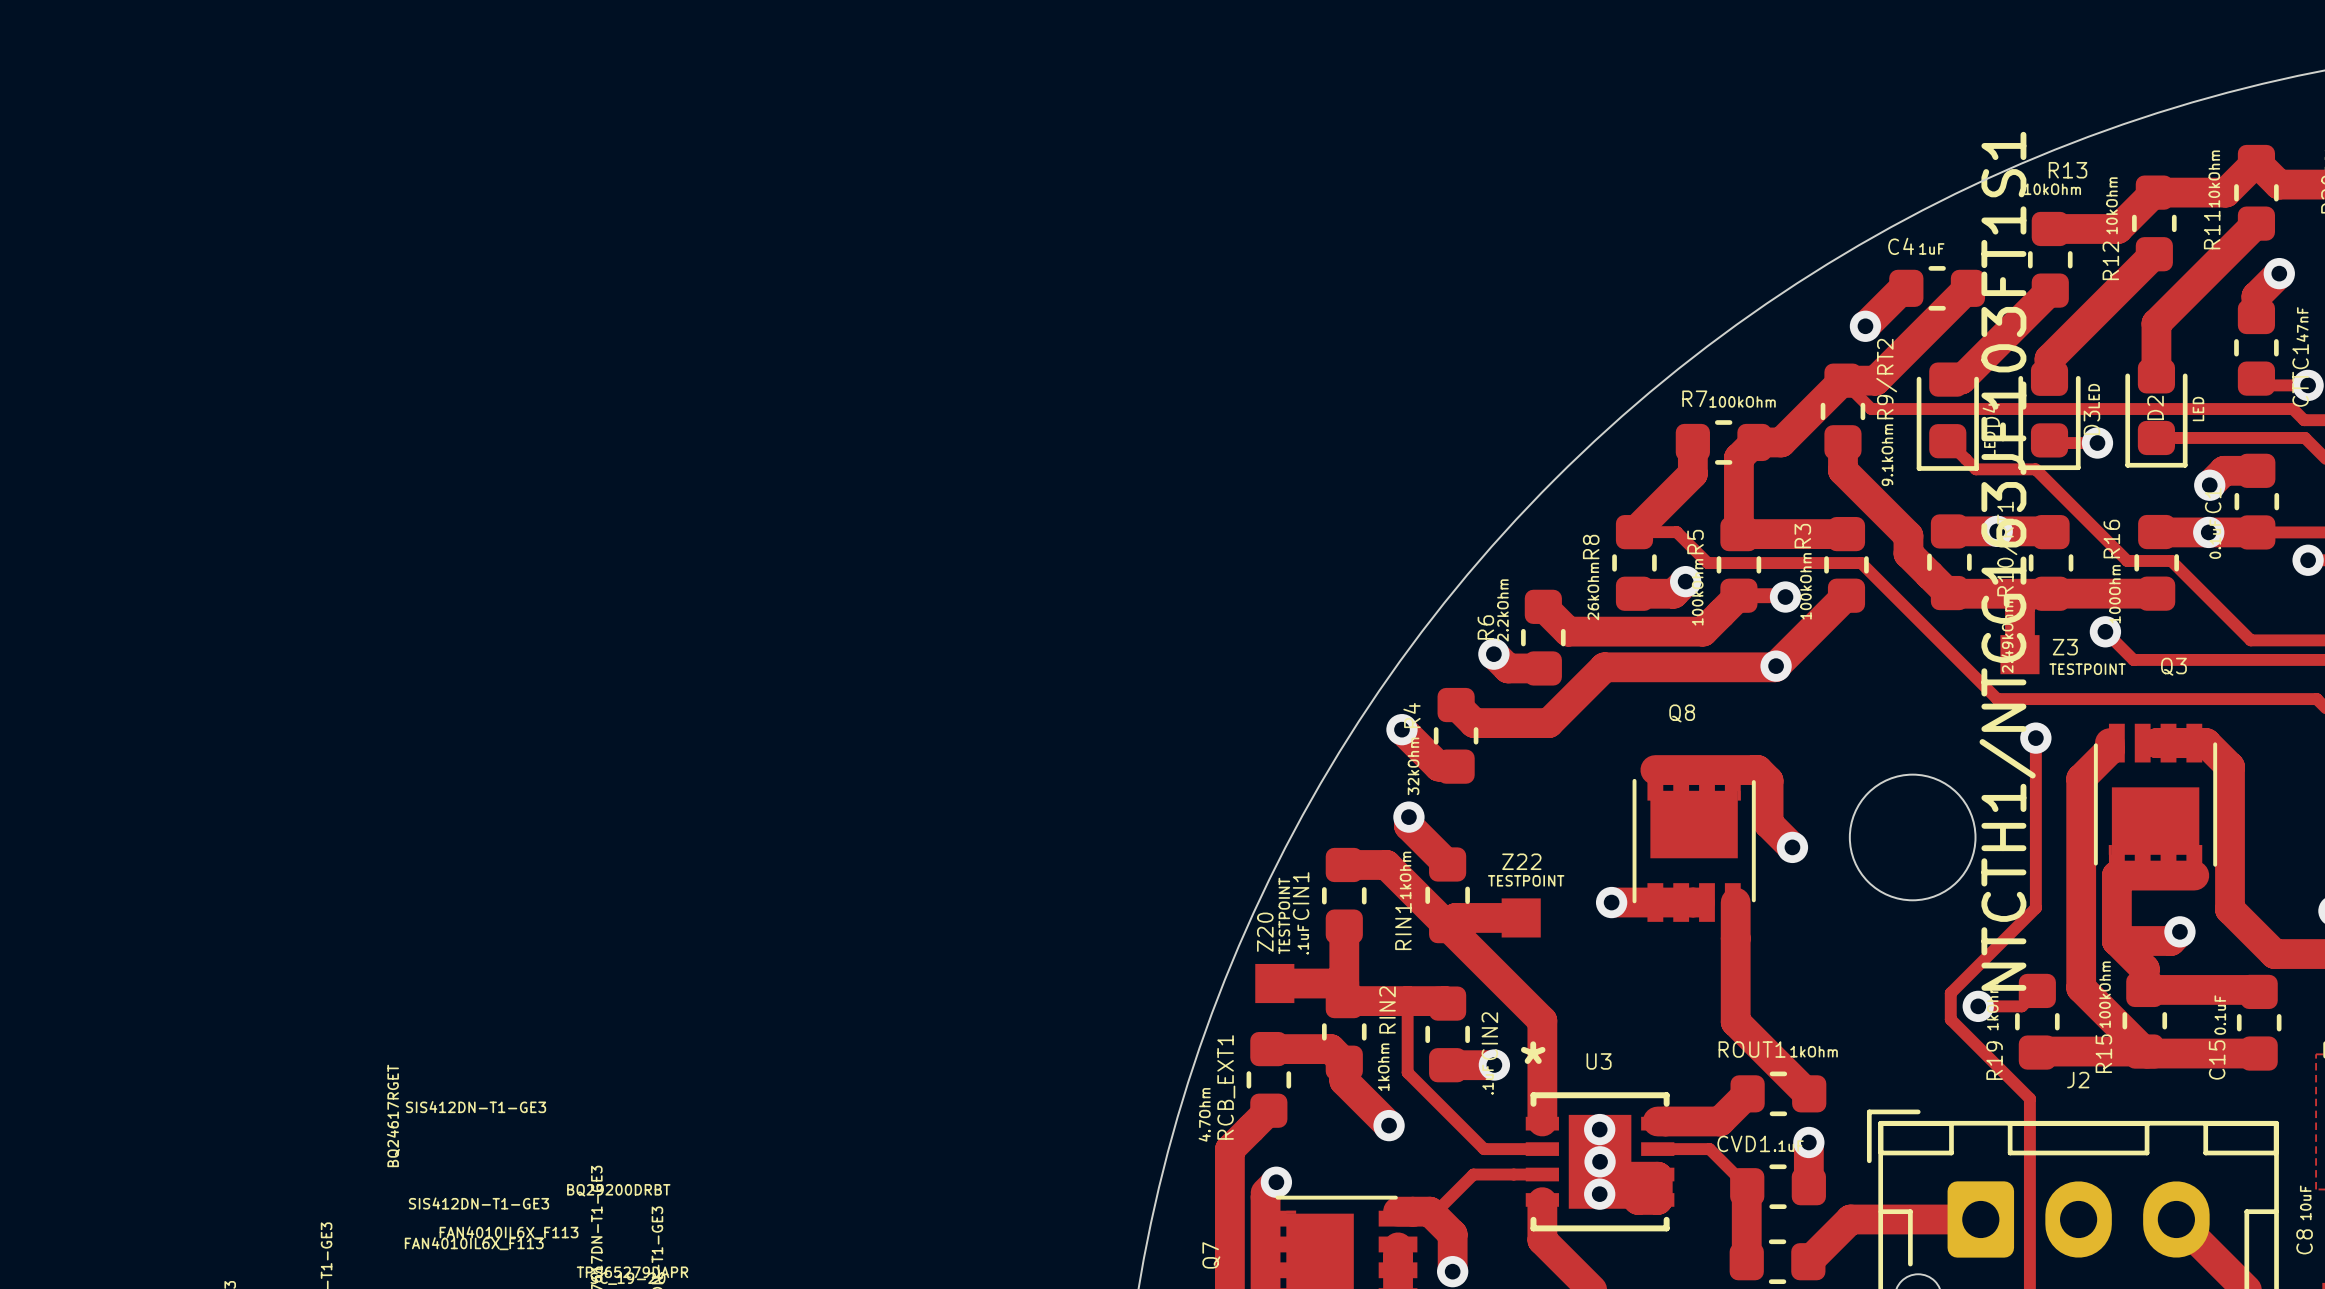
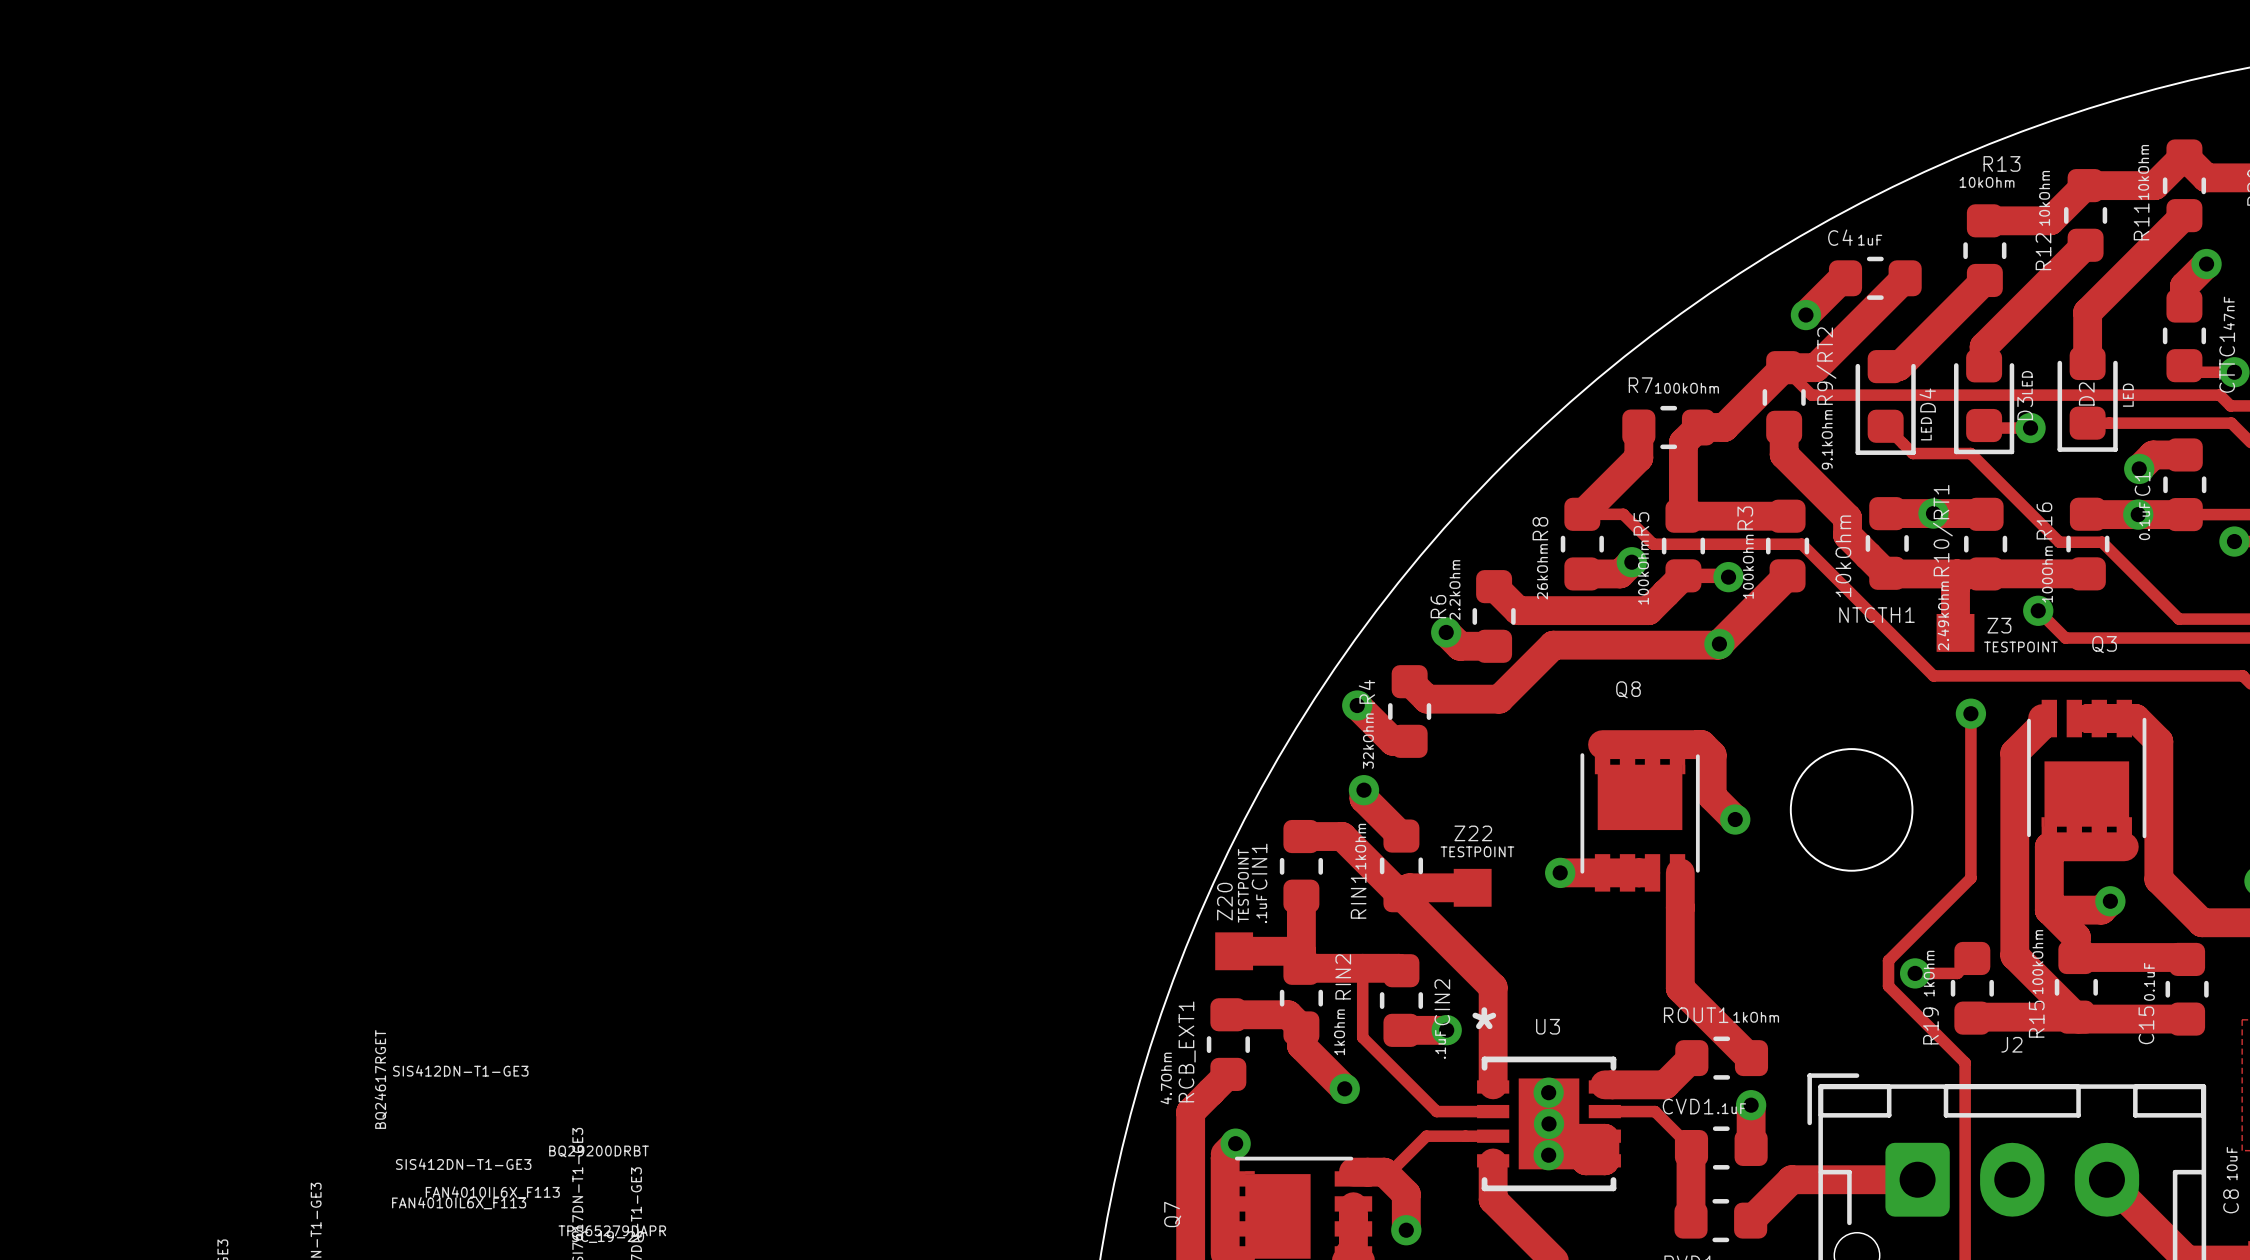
NTCTH1/NTCG163JF103FT1S1 name: NTCTH1/NTCG163JF103FT1S1 (2007, 561) -> NTCTH1 (1876, 615)
NTCTH1/NTCG163JF103FT1S1 value: none -> 10kOhm (1843, 556)

